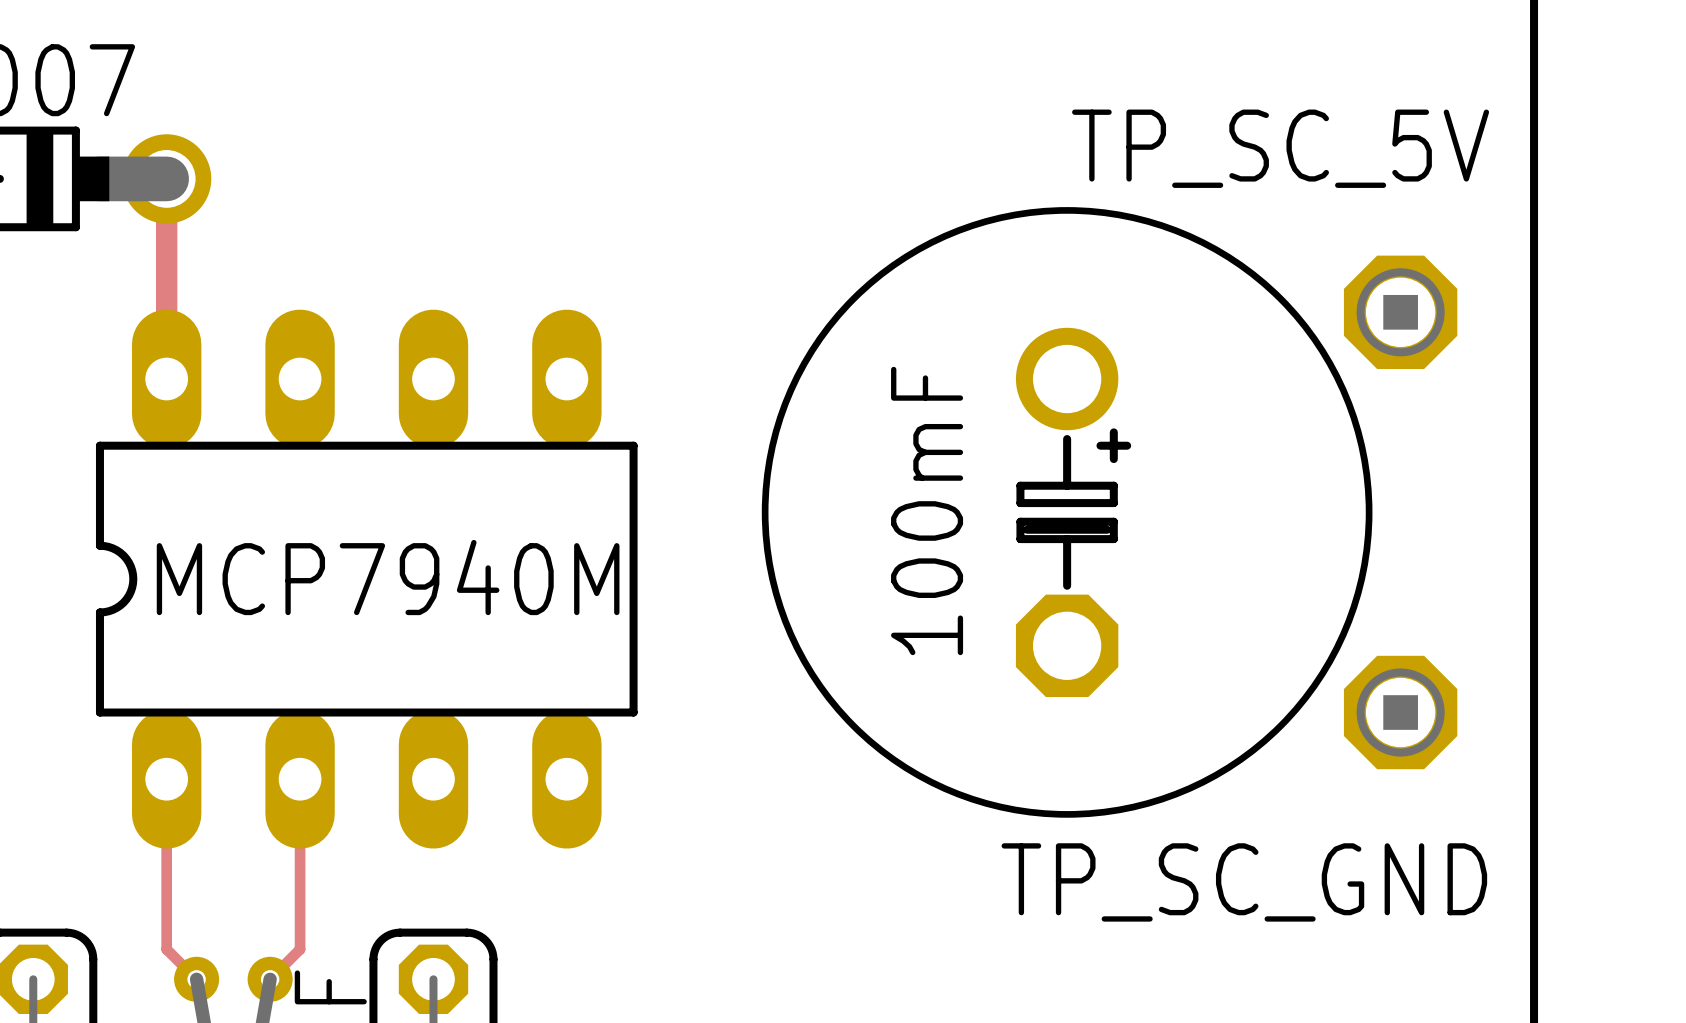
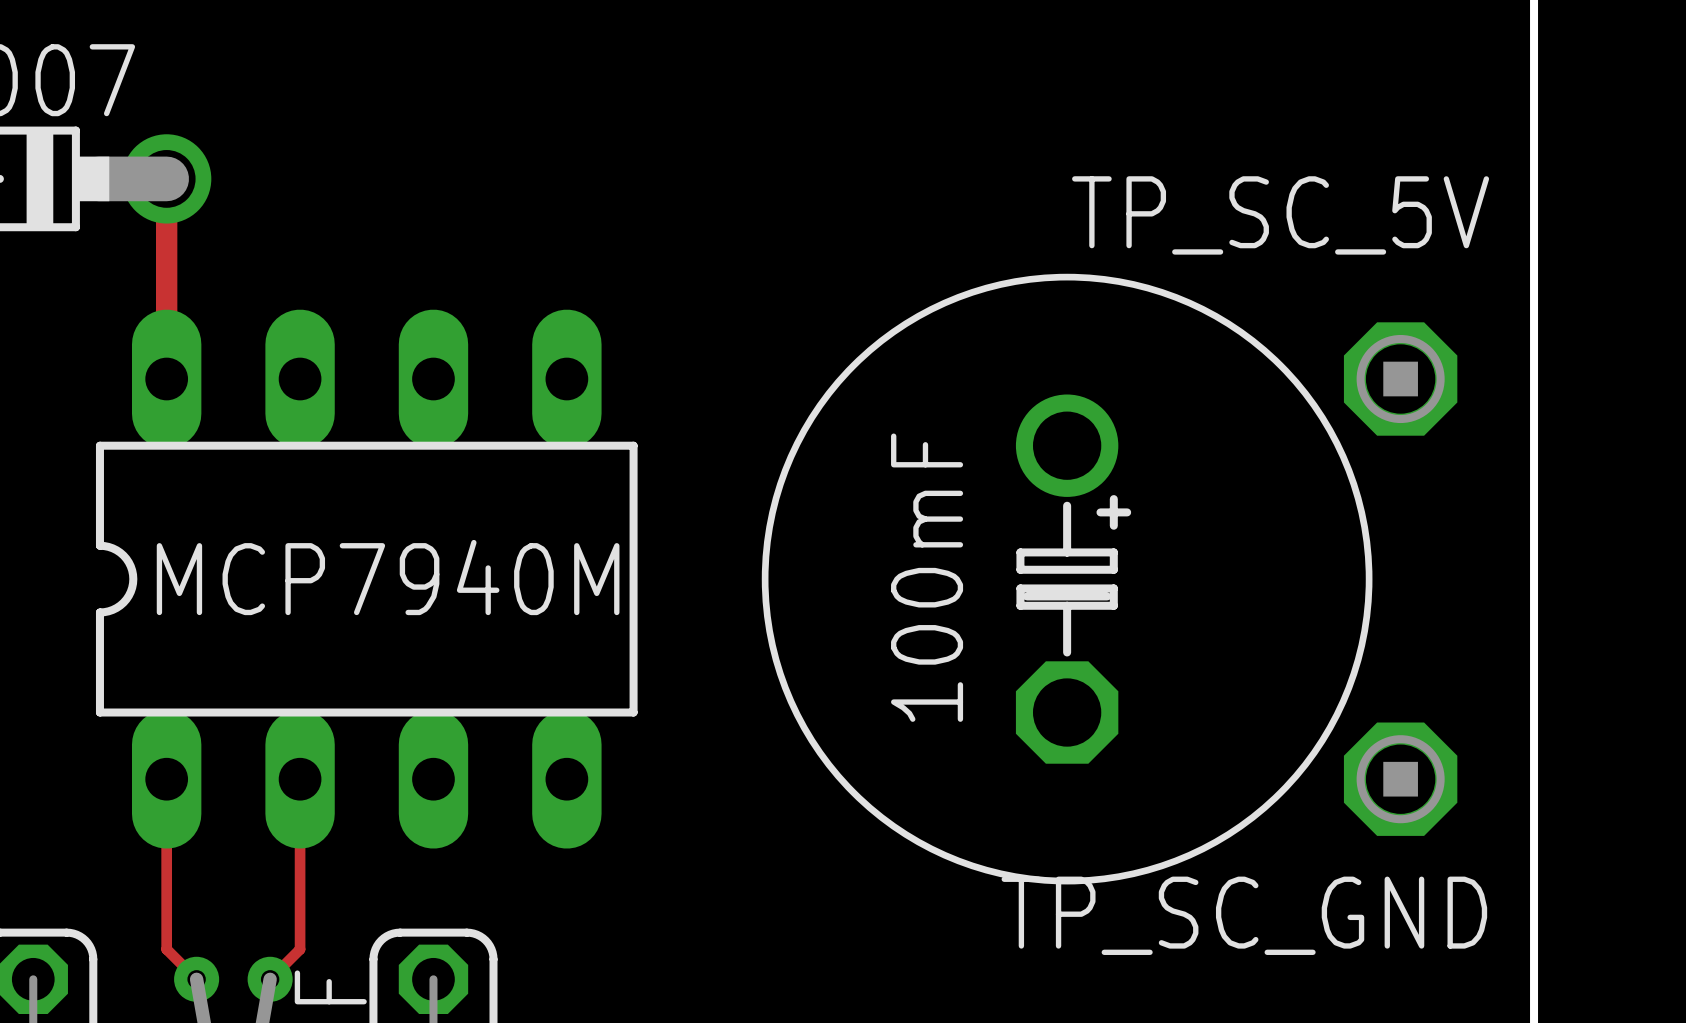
TP_SC_5V position: (1400, 312) -> (1400, 379)
part position: (1067, 512) -> (1067, 579)
TP_SC_GND position: (1400, 712) -> (1400, 779)
TP_SC_GND name position: TP_SC_GND (1244, 882) -> TP_SC_GND (1244, 915)

